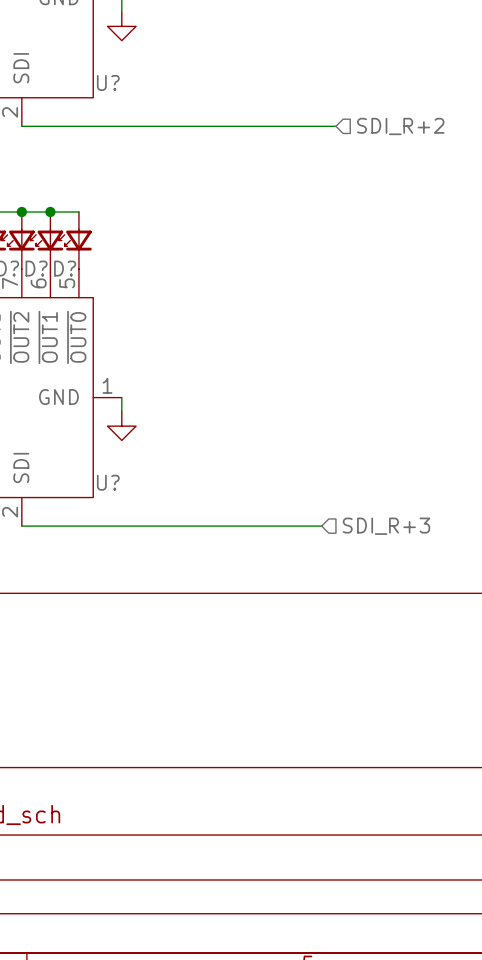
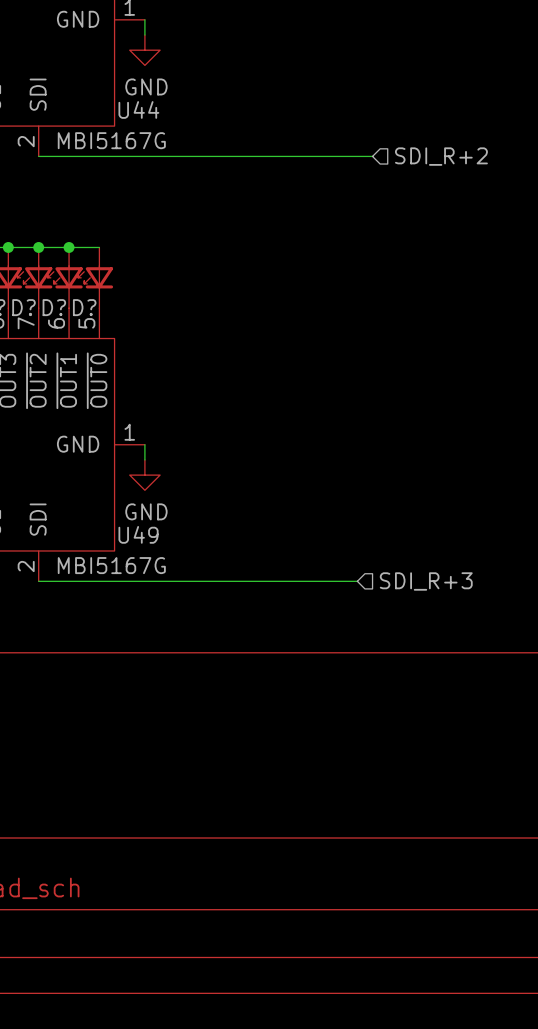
power symbol text: none -> GND (146, 86)
U? name: U? (108, 82) -> U44 (138, 109)
U? value: none -> MBI5167G (111, 140)
power symbol text: none -> GND (146, 511)
U? name: U? (108, 482) -> U49 (138, 534)
U? value: none -> MBI5167G (111, 565)

